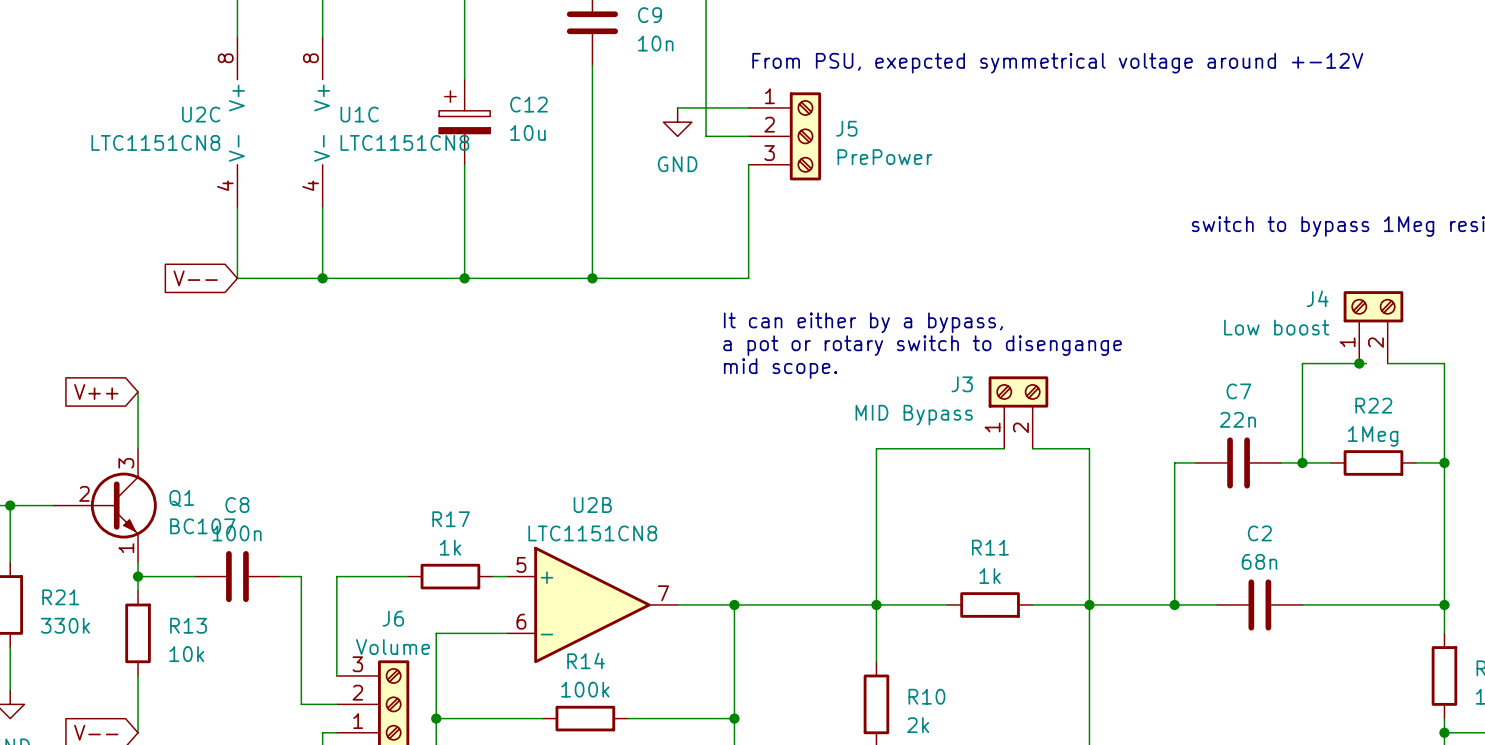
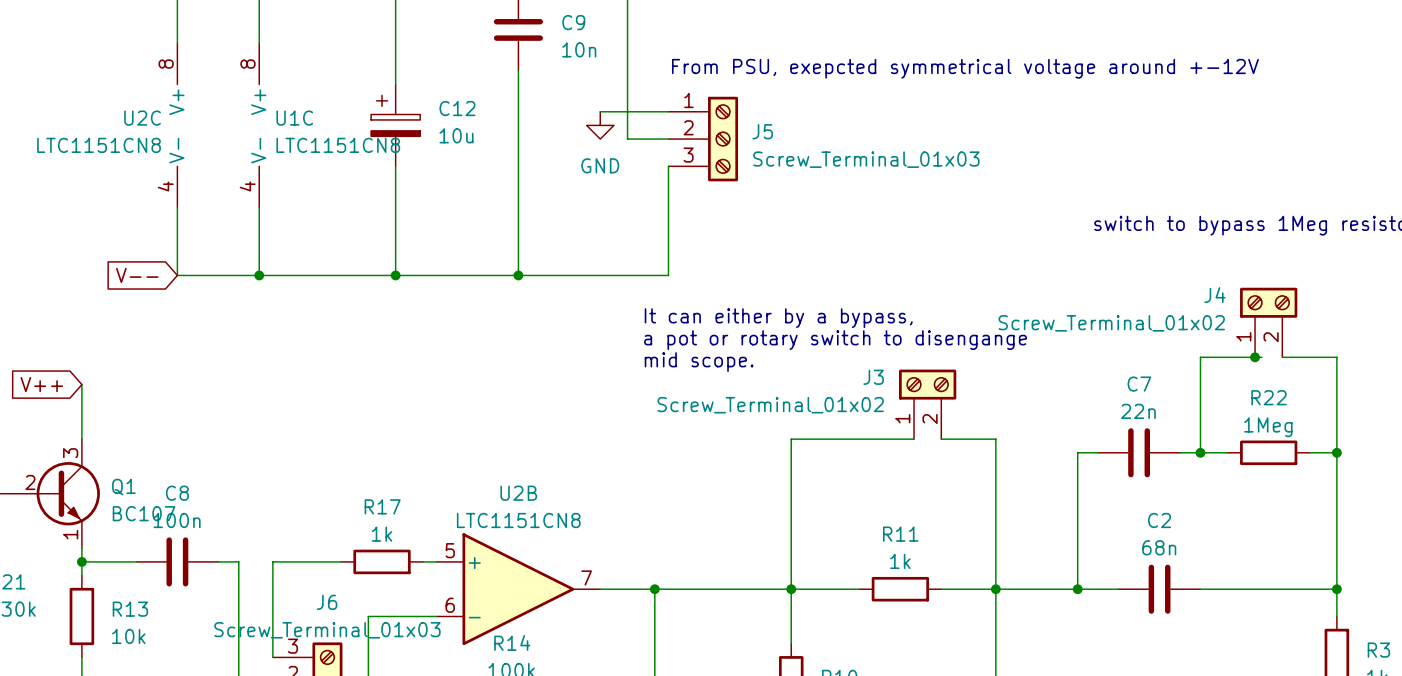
J5 value: PrePower (885, 157) -> Screw_Terminal_01x03 (866, 159)
J4 value: Low boost (1276, 327) -> Screw_Terminal_01x02 (1111, 323)
J3 value: MID Bypass (914, 415) -> Screw_Terminal_01x02 (770, 405)
J6 value: Volume (392, 647) -> Screw_Terminal_01x03 (327, 630)

